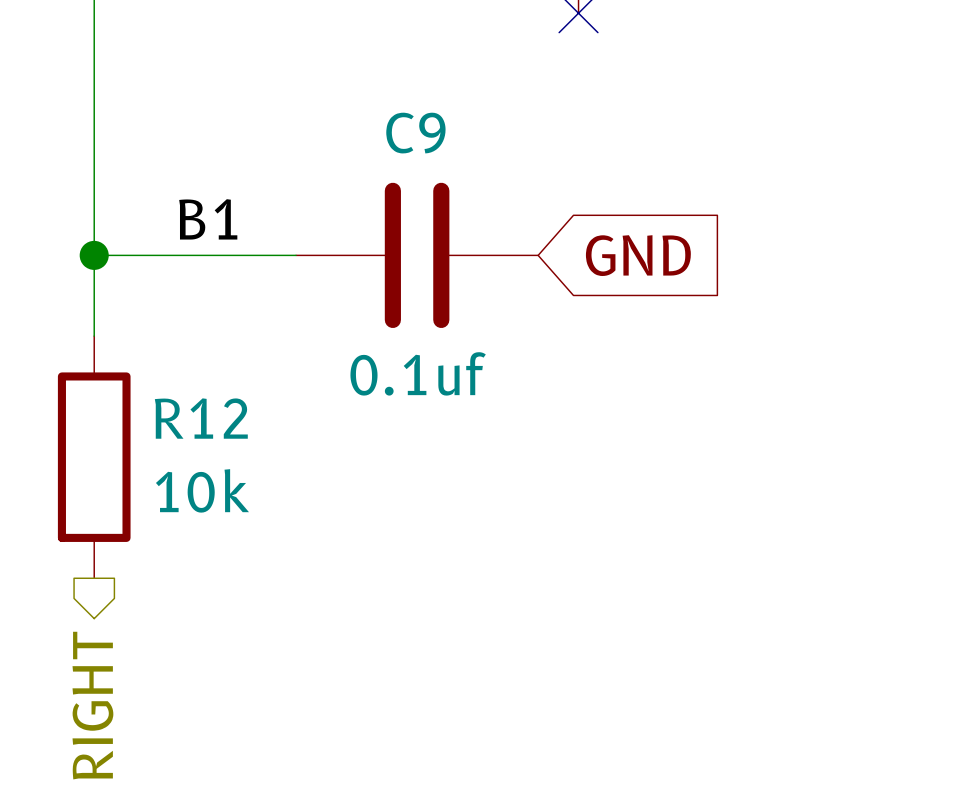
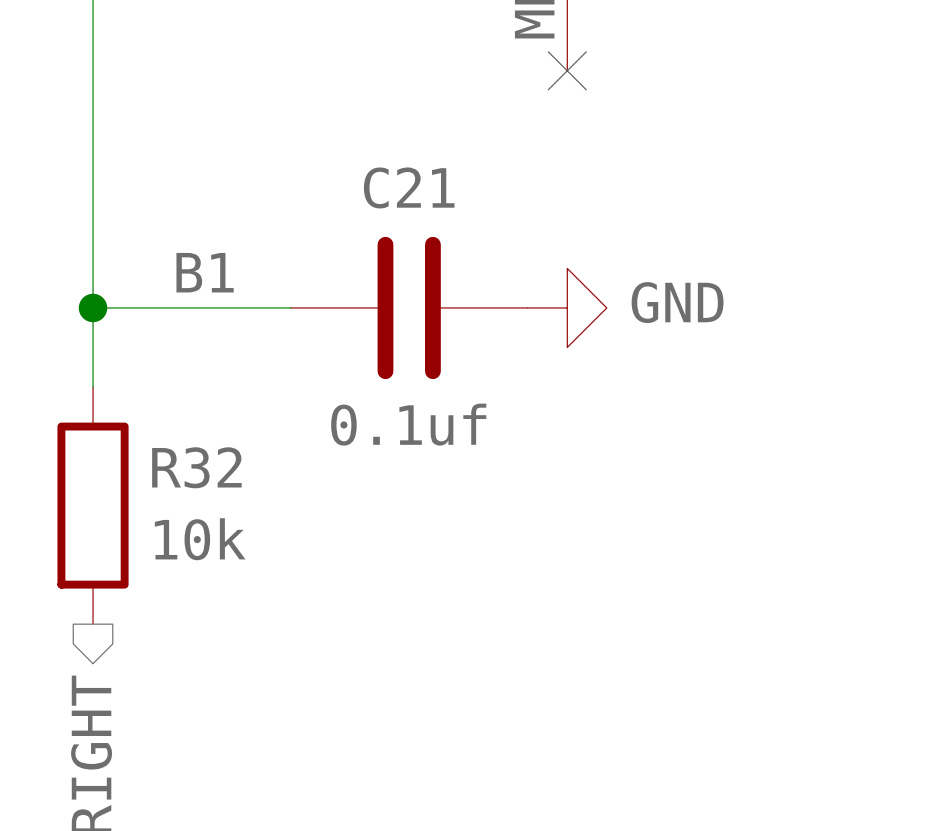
C9 name: C9 (415, 133) -> C21 (409, 187)
power symbol: none -> GND (567, 307)
global label: GND (638, 255) -> none
R12 name: R12 (201, 418) -> R32 (196, 467)

